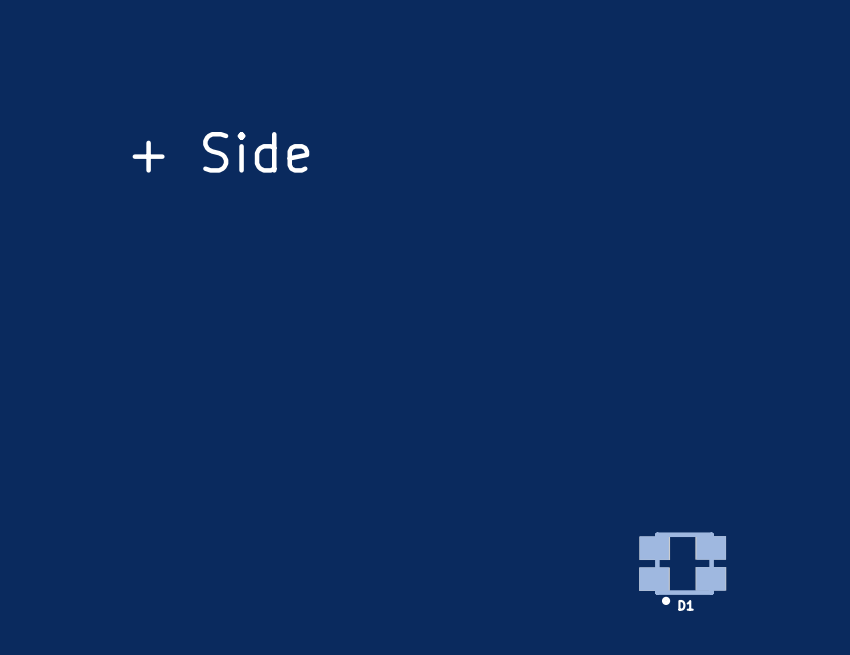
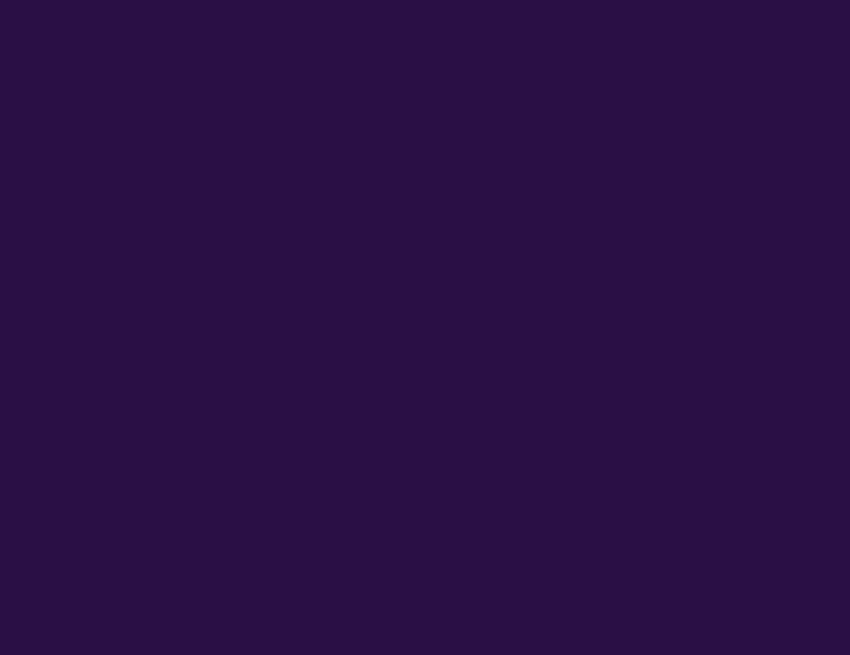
text: + Side (220, 152) -> none
D1: (682, 568) -> none

